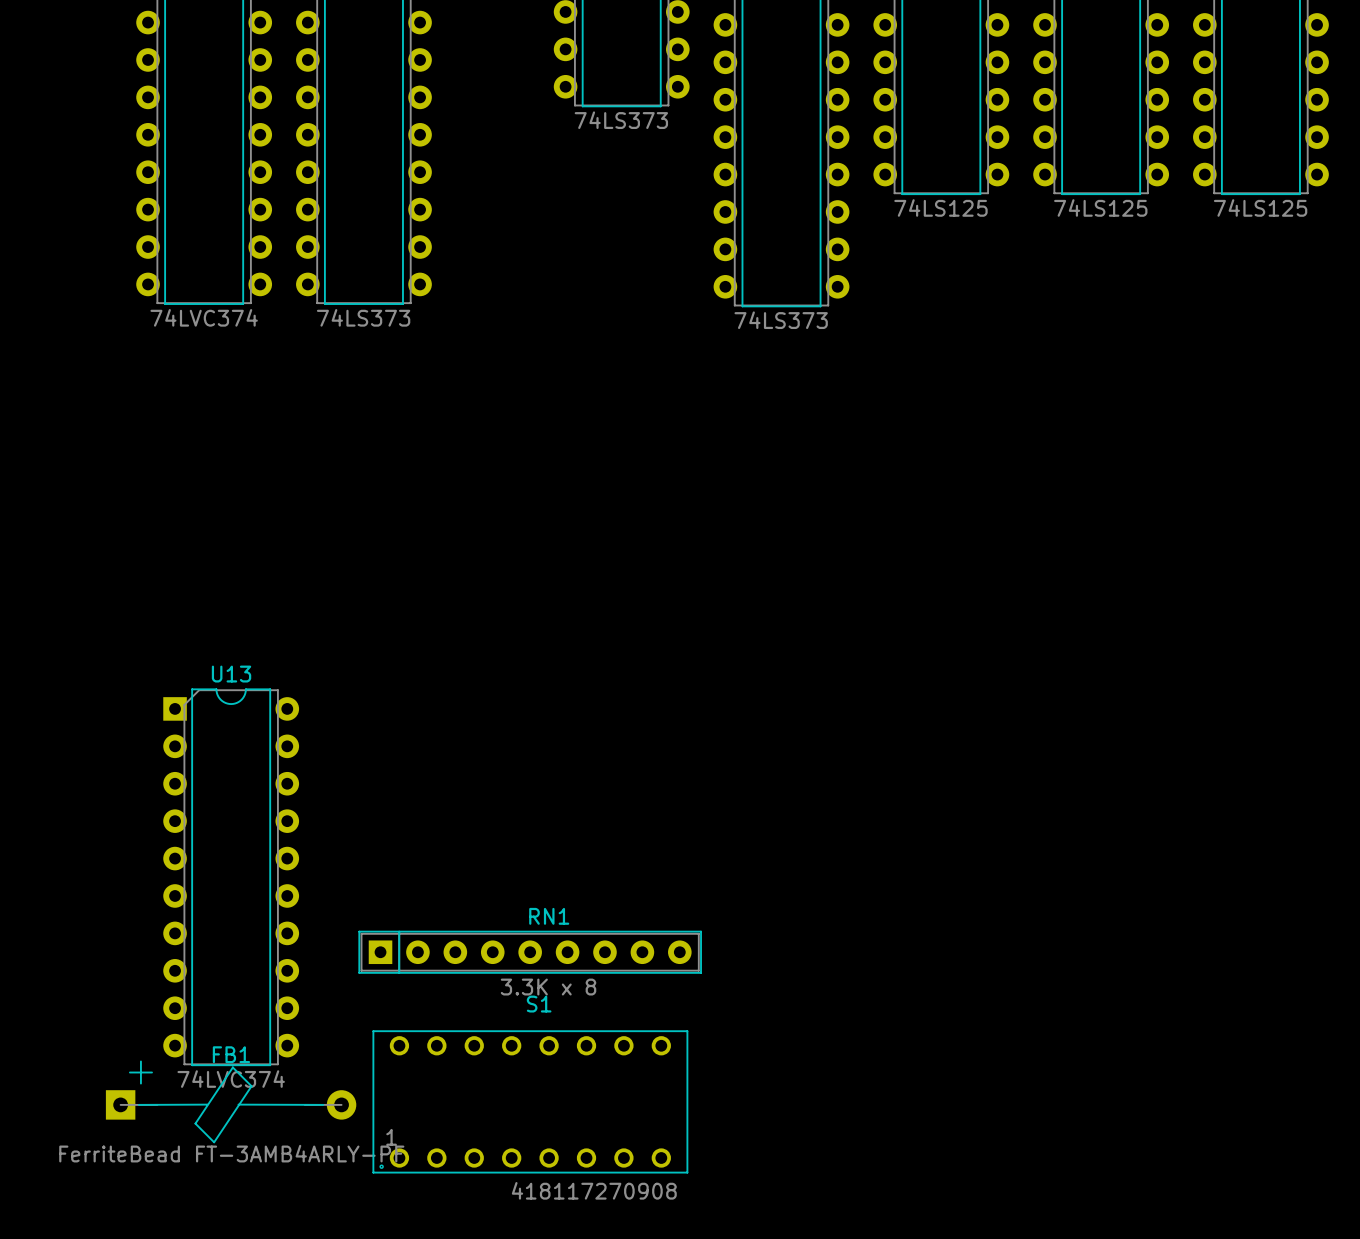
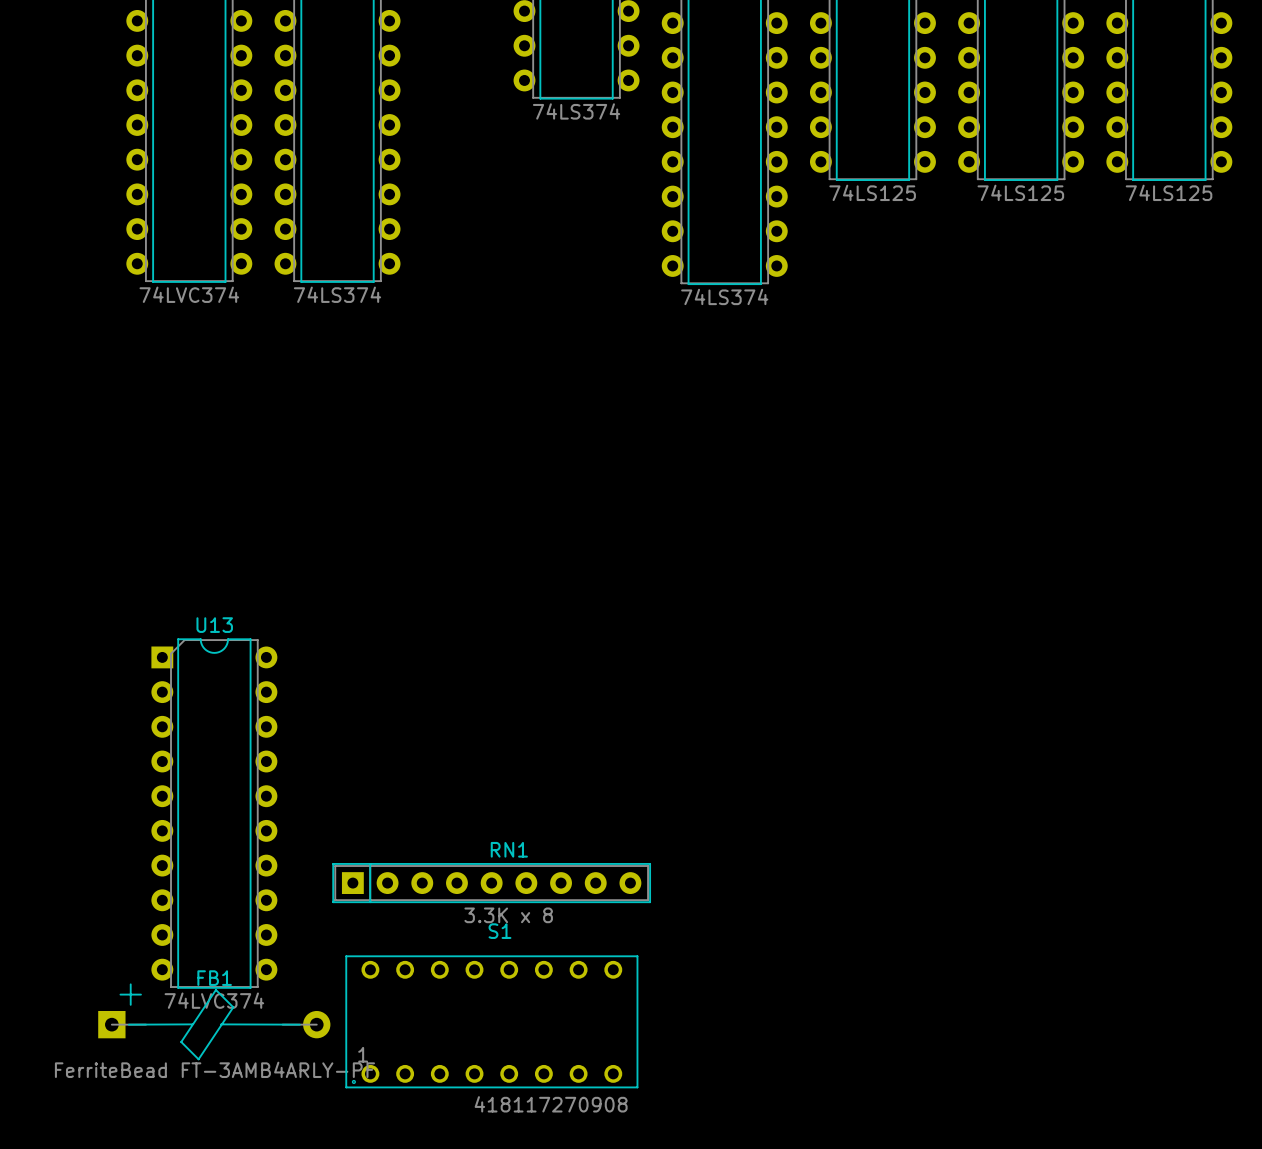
part value: 74LS373 (621, 120) -> 74LS374 (576, 111)
part value: 74LS373 (363, 317) -> 74LS374 (337, 294)
part value: 74LS373 (781, 320) -> 74LS374 (724, 296)

